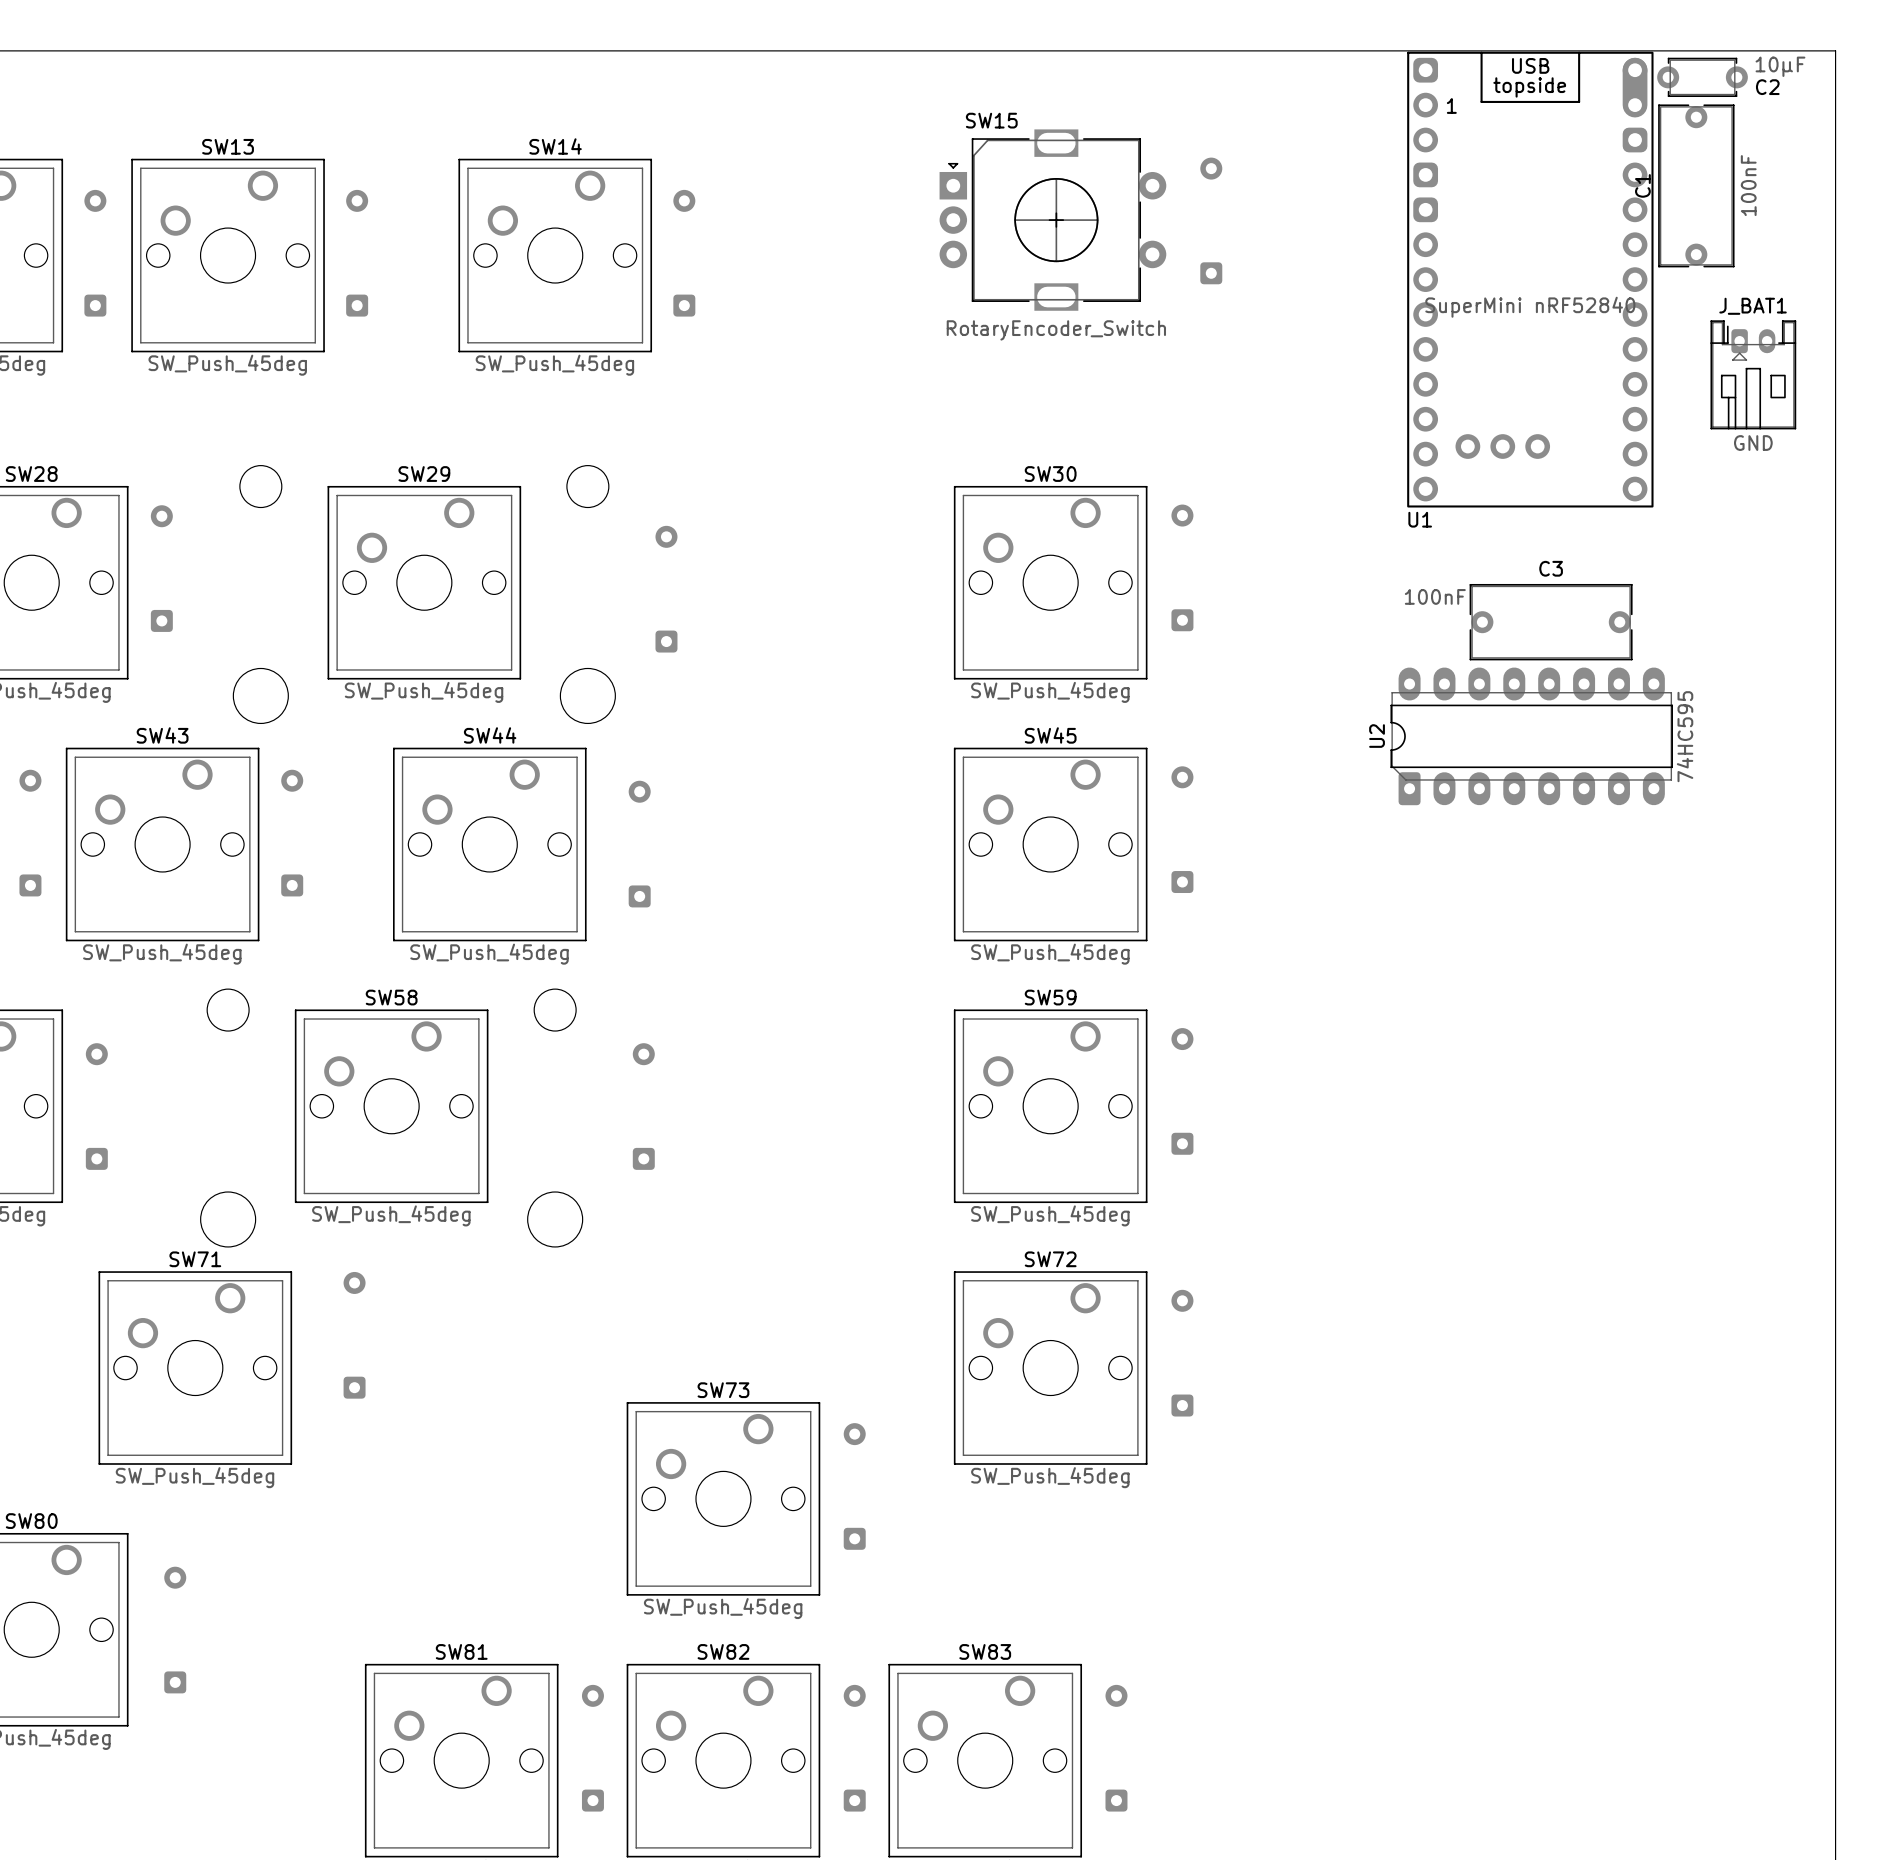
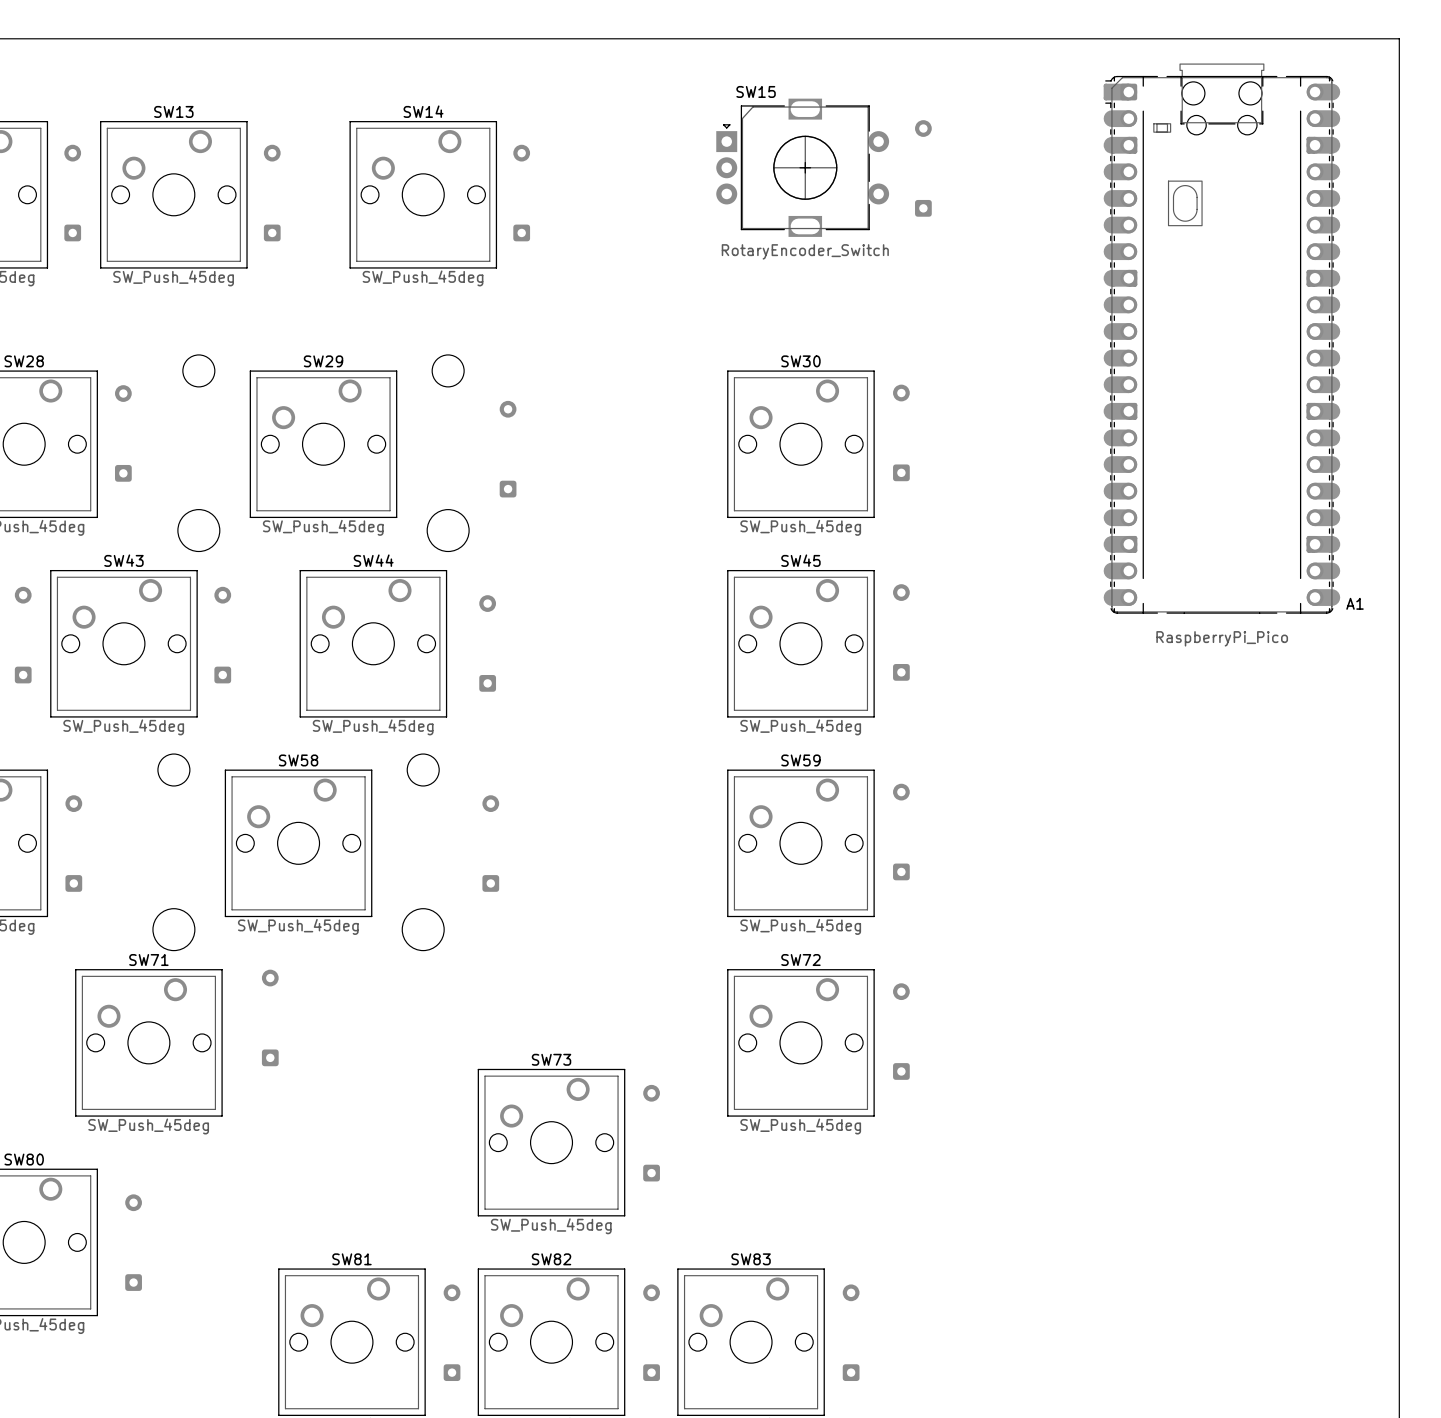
C2: 10µF (1702, 77) -> none
C1: 100nF (1696, 185) -> none
U1: SuperMini nRF52840 (1530, 279) -> none
J_BAT1: GND (1753, 374) -> none
A1: none -> RaspberryPi_Pico (1221, 338)
C3: 100nF (1551, 622) -> none
U2: 74HC595 (1531, 736) -> none

